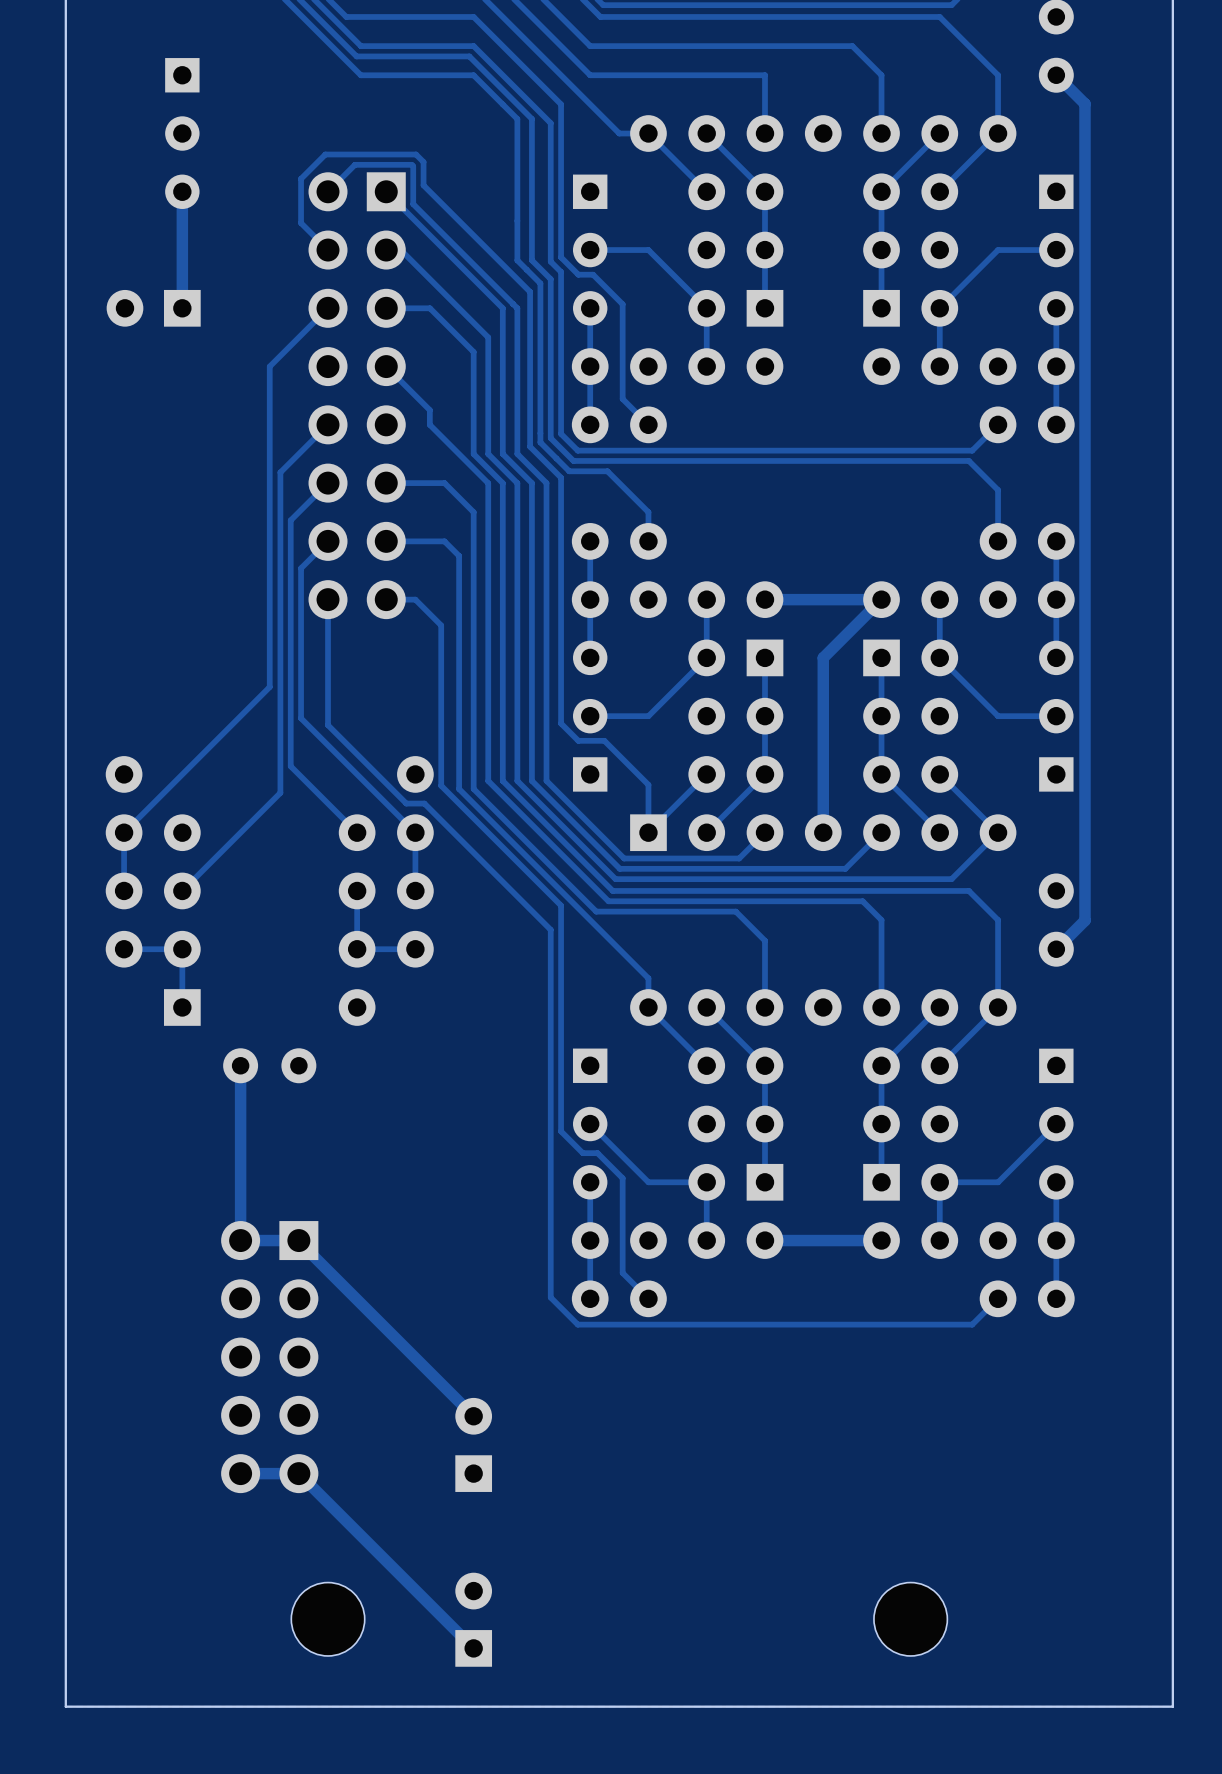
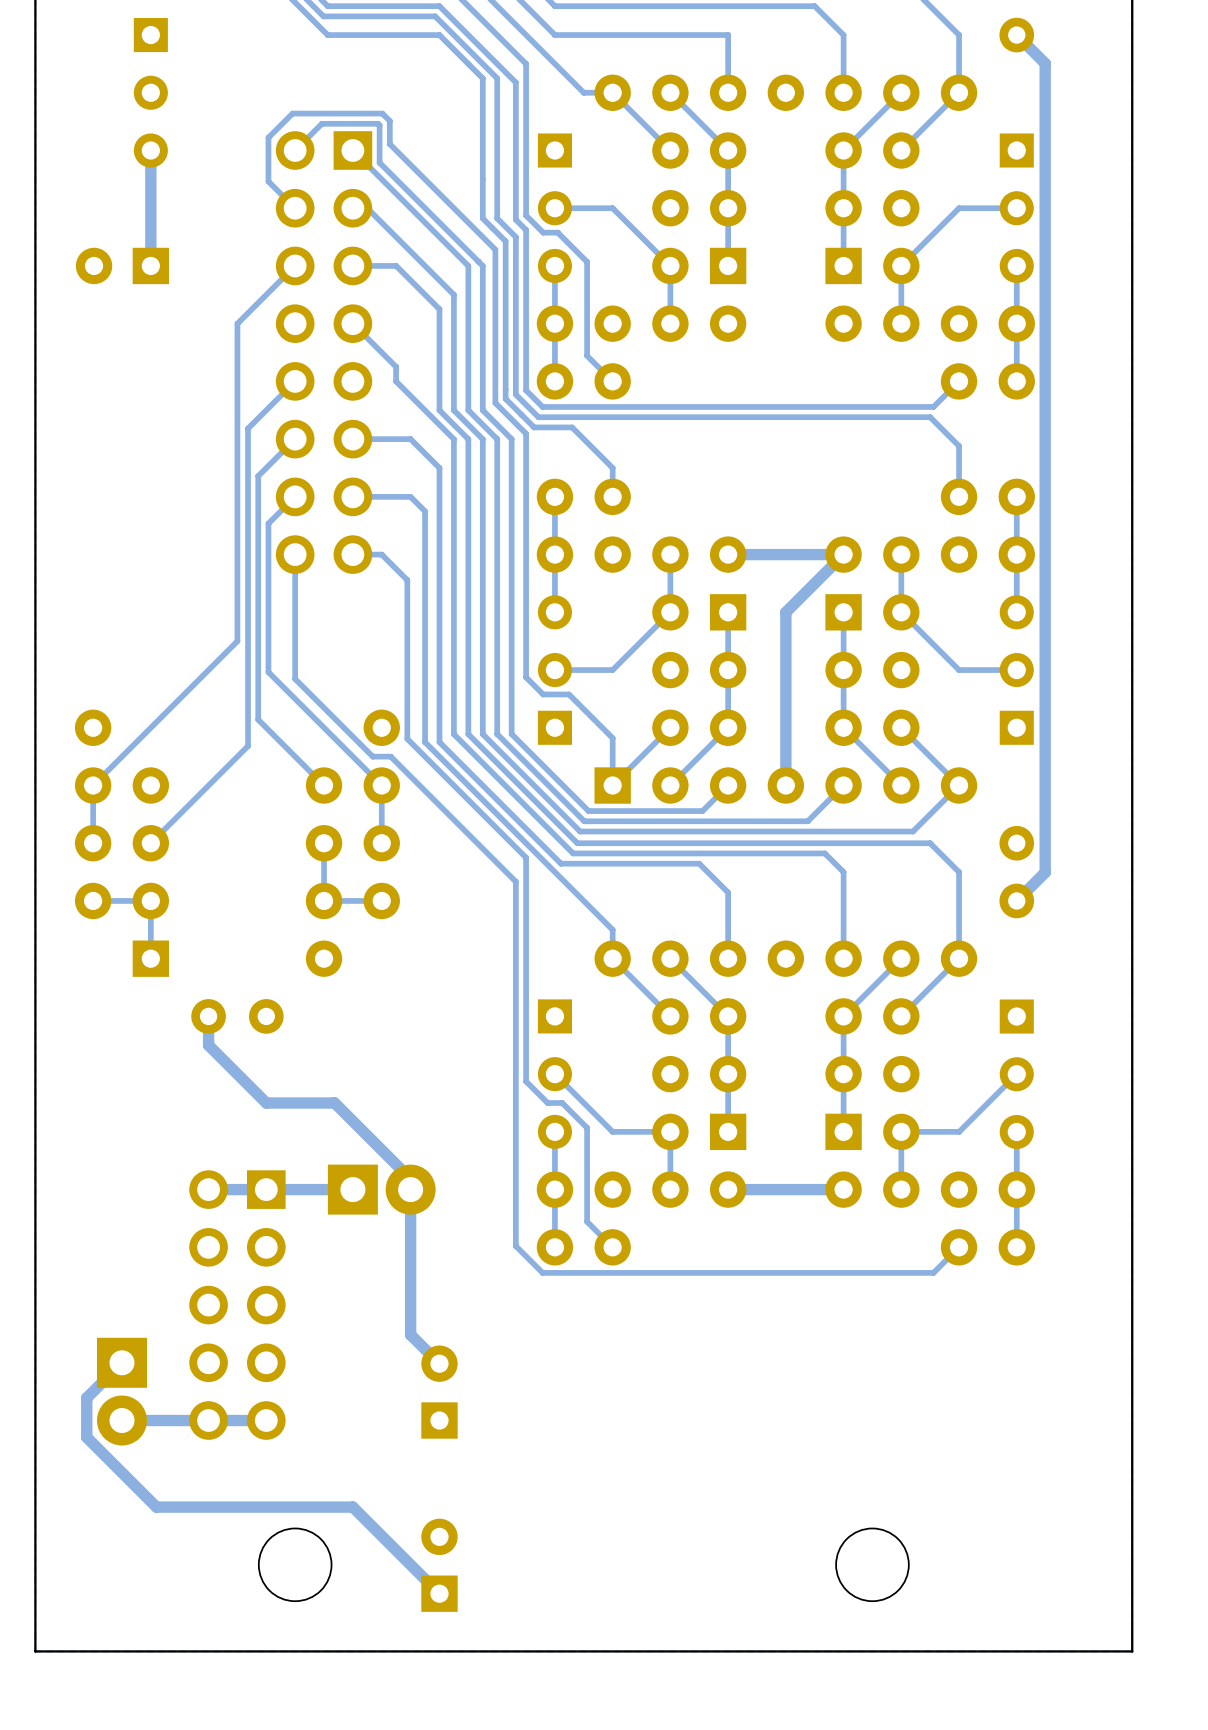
track: (240, 1094) (240, 1240) -> none
track: none -> (352, 1189) (266, 1189)
part: none -> (381, 1189)
track: (298, 1241) (444, 1387) -> (208, 1045) (266, 1103) (334, 1103) (410, 1178) (410, 1334)
part: none -> (121, 1391)
track: none -> (208, 1420) (121, 1420)
track: (298, 1473) (386, 1561) -> (121, 1362) (86, 1398) (86, 1437) (156, 1507) (352, 1507)

